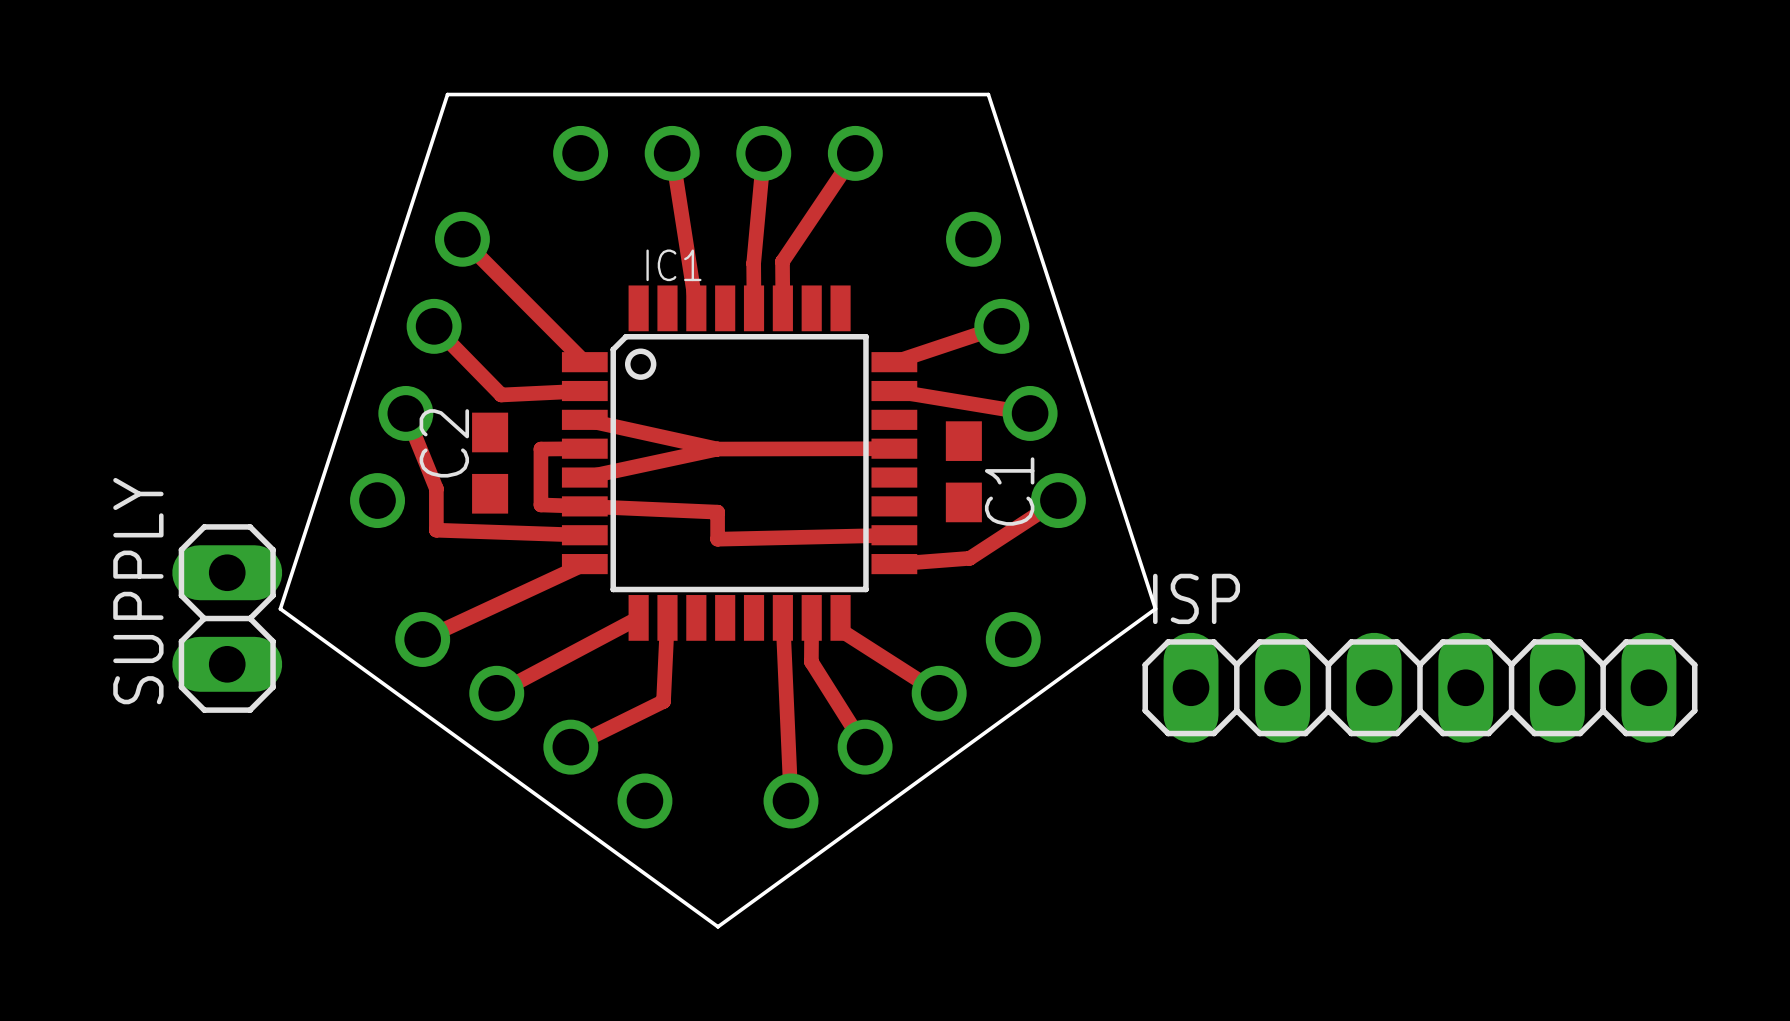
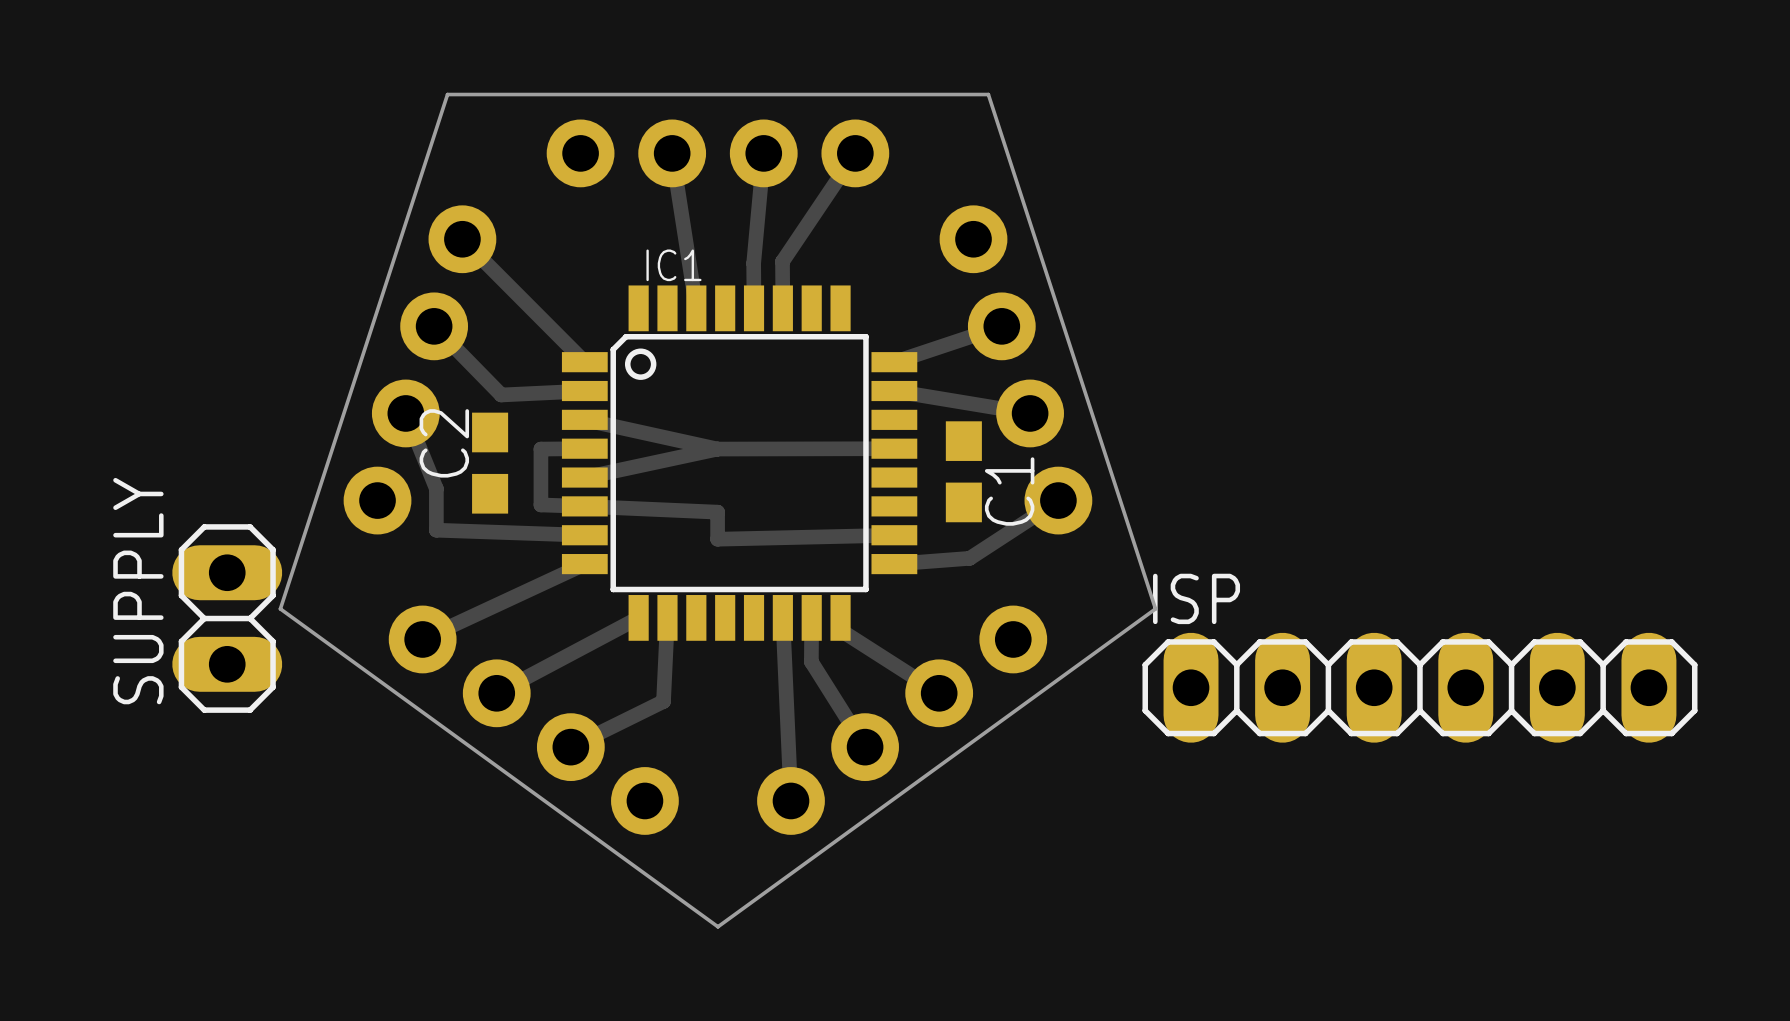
part footprint: [553, 125, 883, 181] -> [546, 119, 890, 188]
part footprint: [350, 211, 490, 529] -> [343, 205, 497, 535]
part footprint: [946, 211, 1086, 529] -> [939, 205, 1093, 535]
part footprint: [395, 612, 673, 829] -> [388, 605, 679, 835]
part footprint: [763, 612, 1041, 829] -> [757, 605, 1048, 835]

